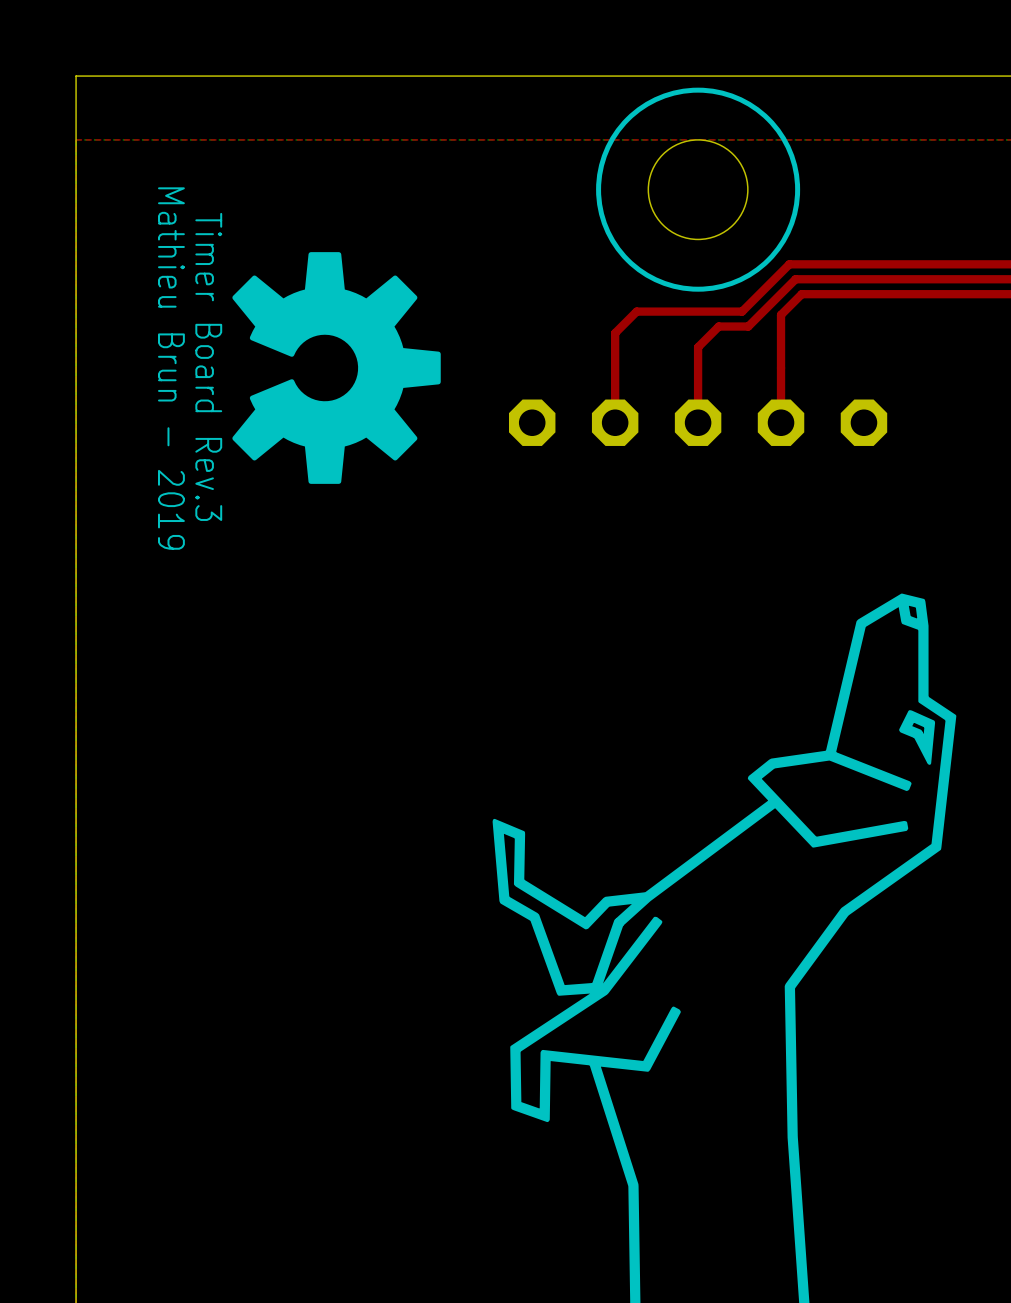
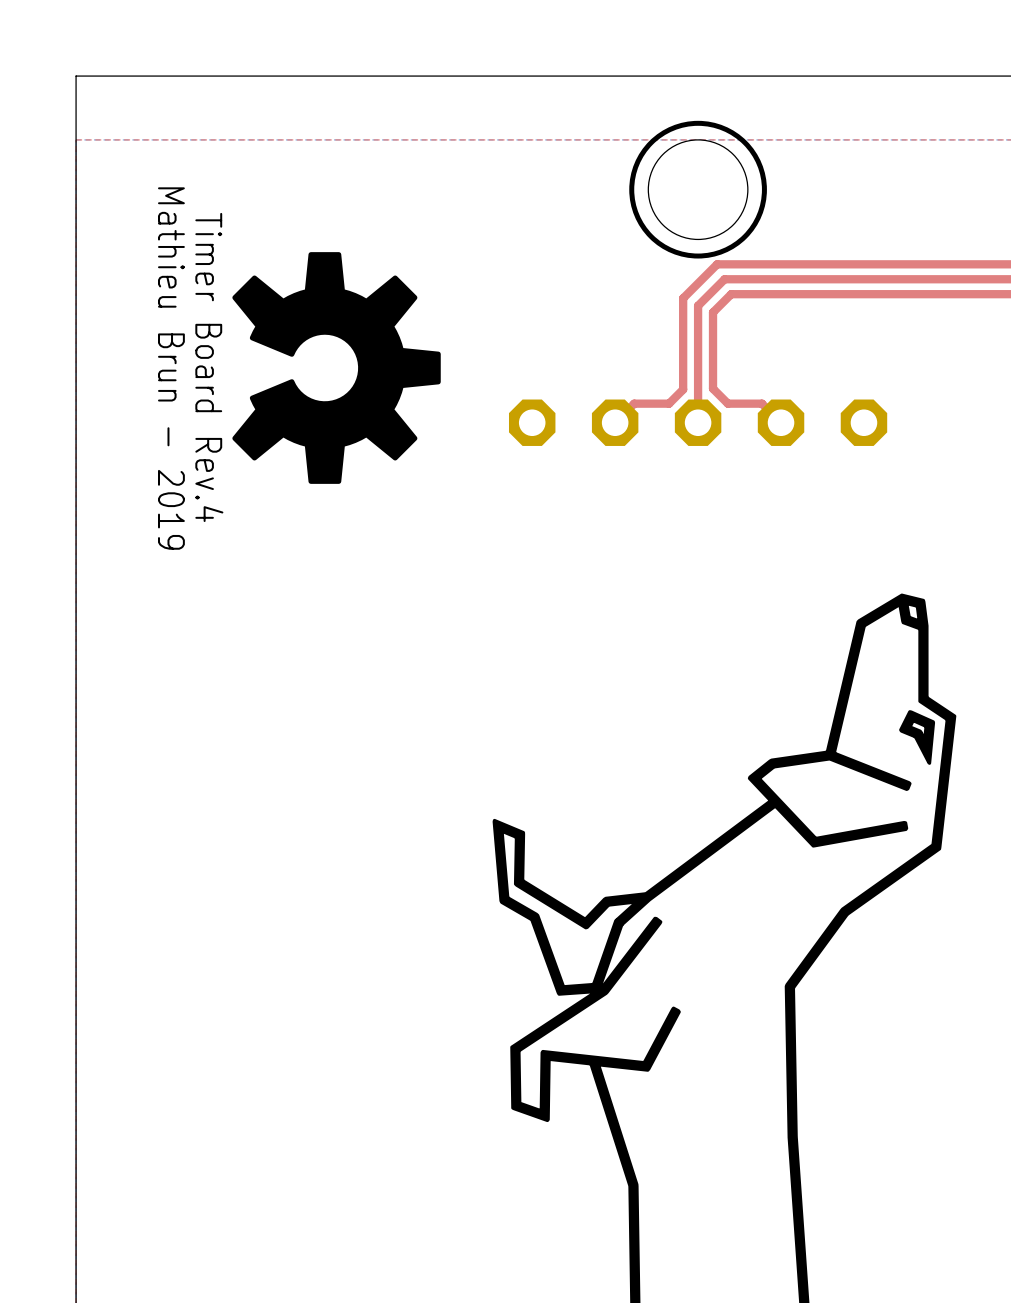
drawing shape: [596, 87, 801, 292] -> [629, 120, 767, 259]
top track: (789, 264) (742, 311) (636, 311) (615, 333) (615, 422) -> (789, 264) (717, 264) (683, 298) (683, 389) (669, 403) (634, 403) (615, 422)
top track: (795, 279) (748, 326) (718, 326) (698, 347) -> (795, 279) (724, 279) (698, 305) (698, 347)
top track: (801, 294) (781, 314) (781, 422) -> (801, 294) (731, 294) (713, 312) (713, 388) (727, 403) (761, 403) (781, 422)
text: Timer Board Rev.3 (208, 366) -> Timer Board Rev.4 (209, 367)

